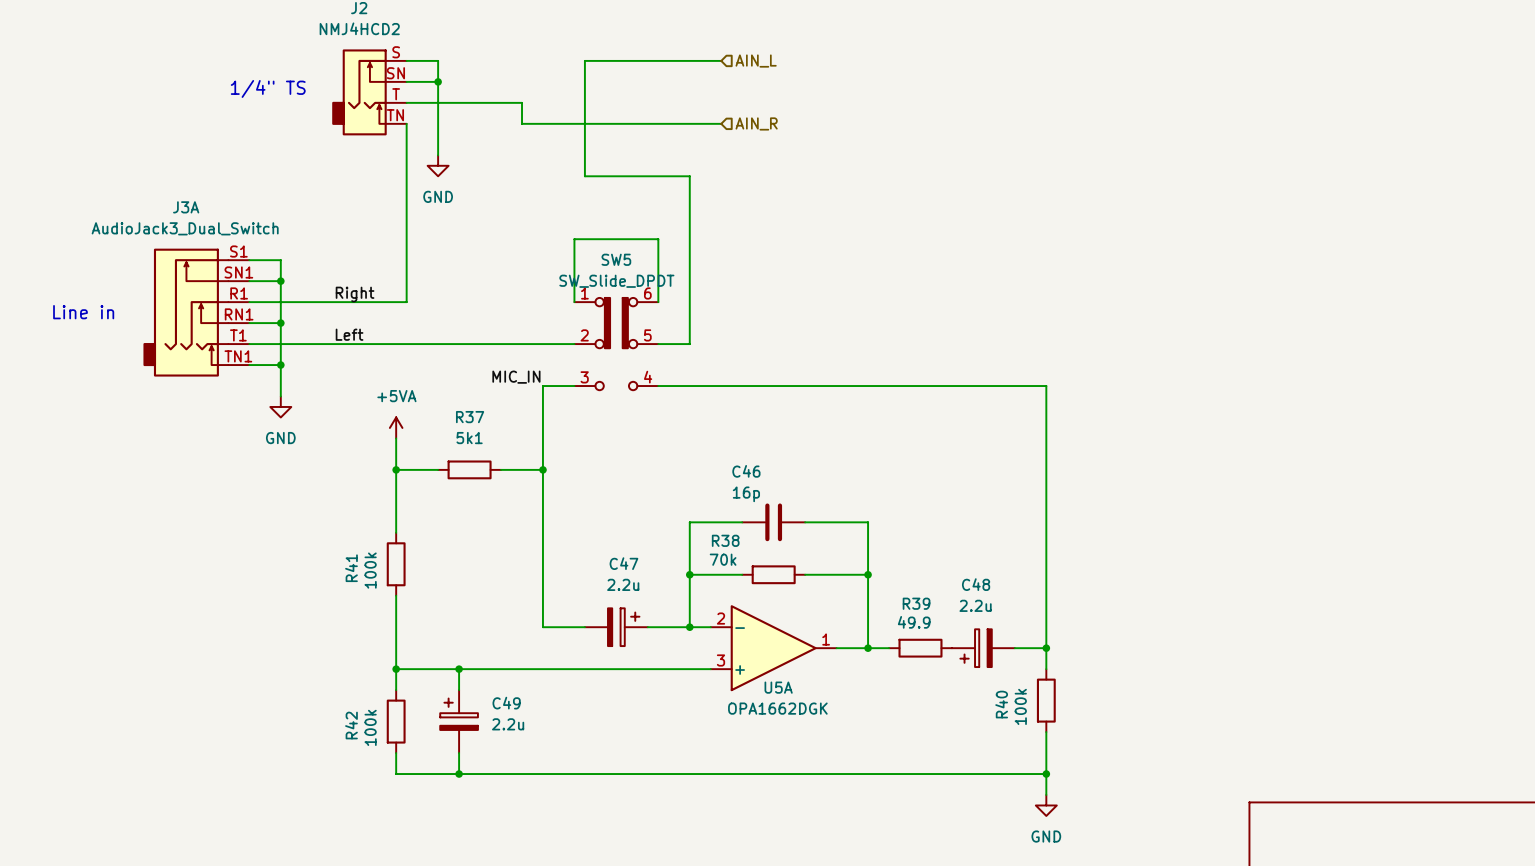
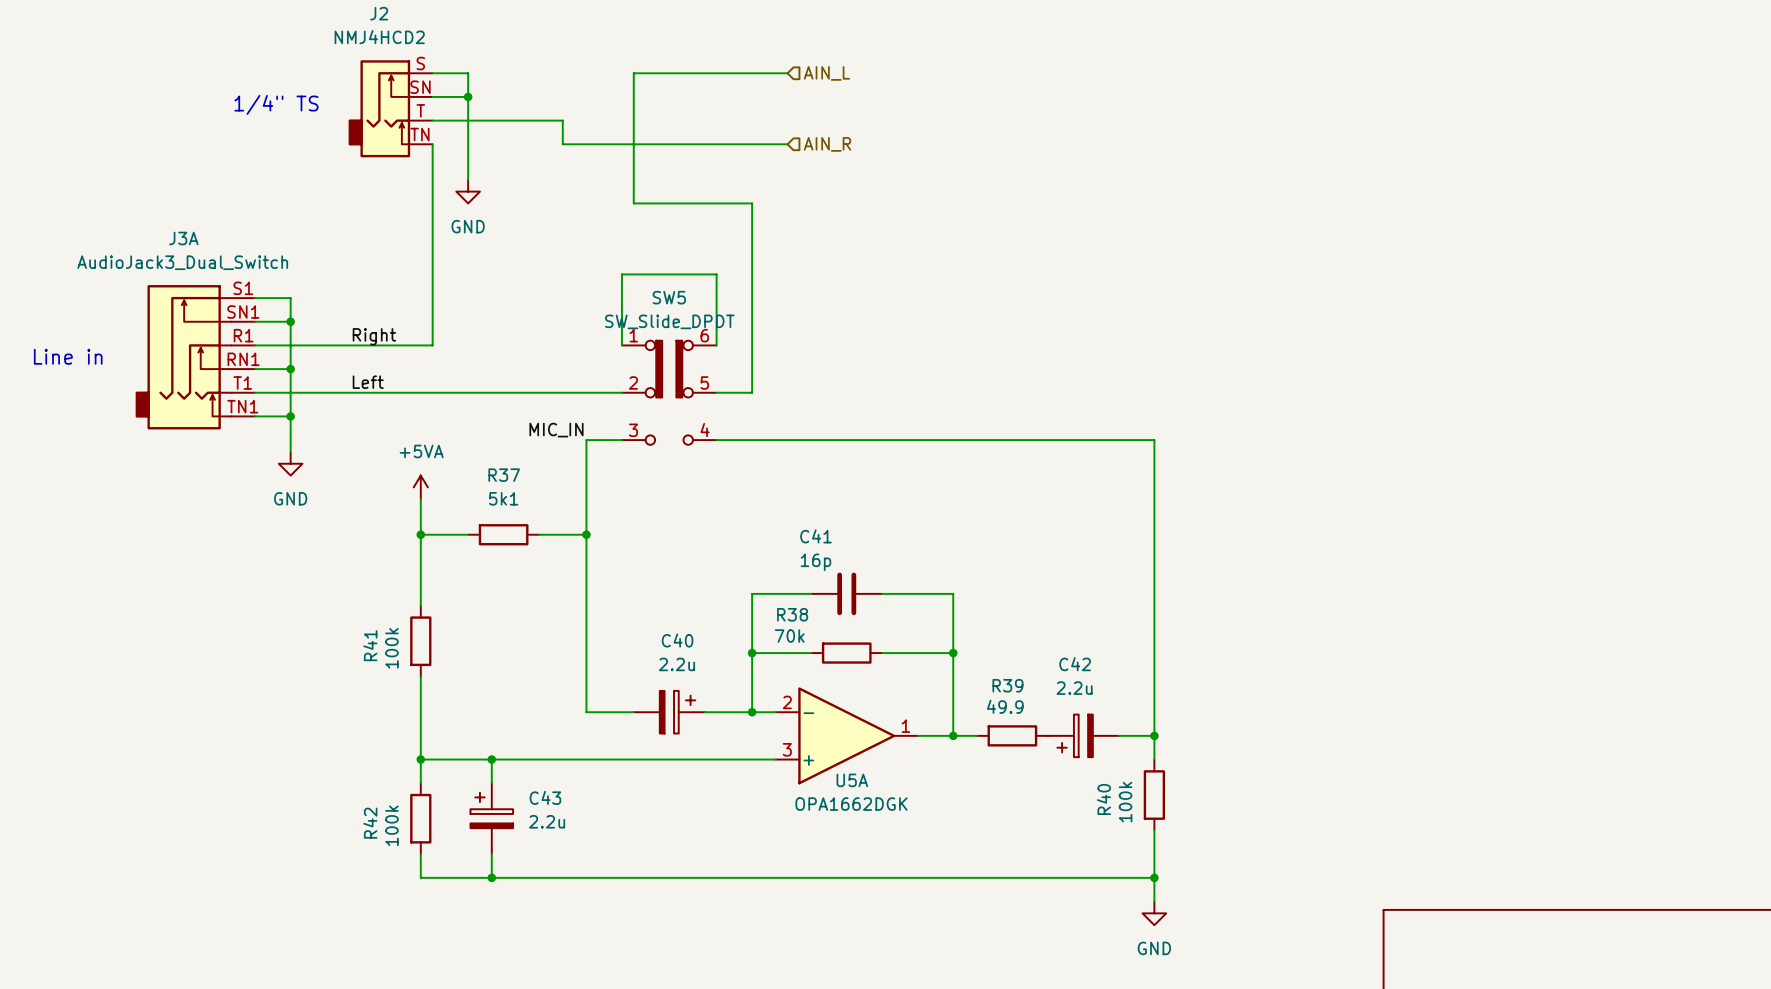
C46 name: C46 (746, 471) -> C41 (815, 536)
C47 name: C47 (623, 563) -> C40 (677, 640)
C48 name: C48 (976, 584) -> C42 (1075, 664)
C49 name: C49 (506, 703) -> C43 (545, 797)

